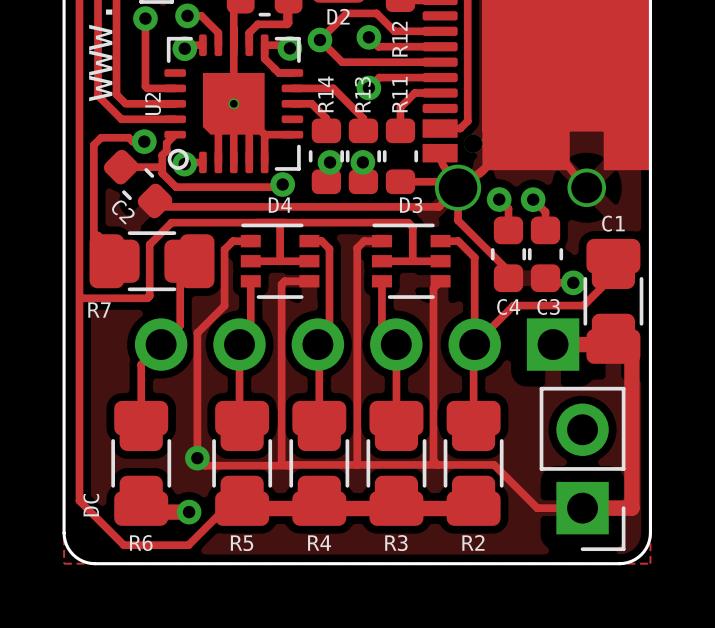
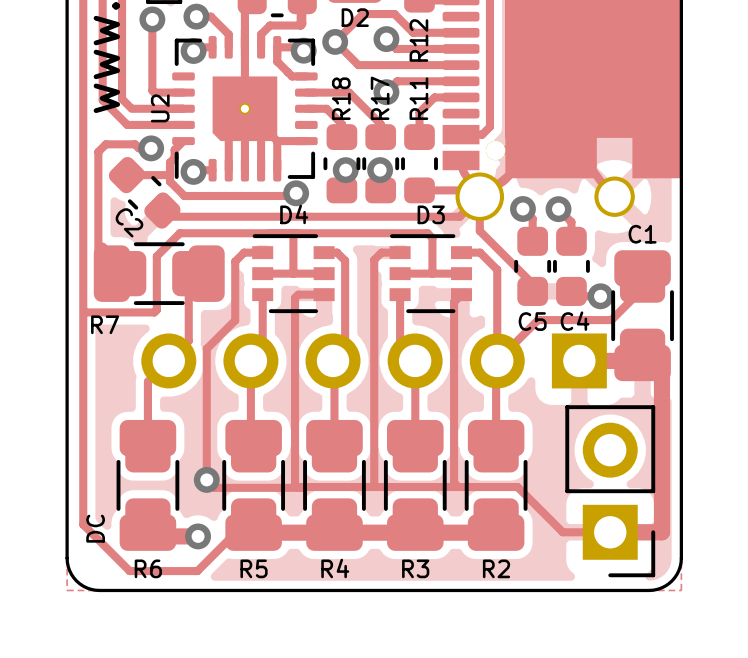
U2 footprint: [164, 34, 304, 174] -> [172, 36, 318, 182]
R14 name: R14 (325, 94) -> R18 (341, 98)
R13 name: R13 (362, 94) -> R17 (380, 98)
C4 name: C4 (508, 306) -> C5 (532, 321)
C3 name: C3 (548, 306) -> C4 (575, 321)

